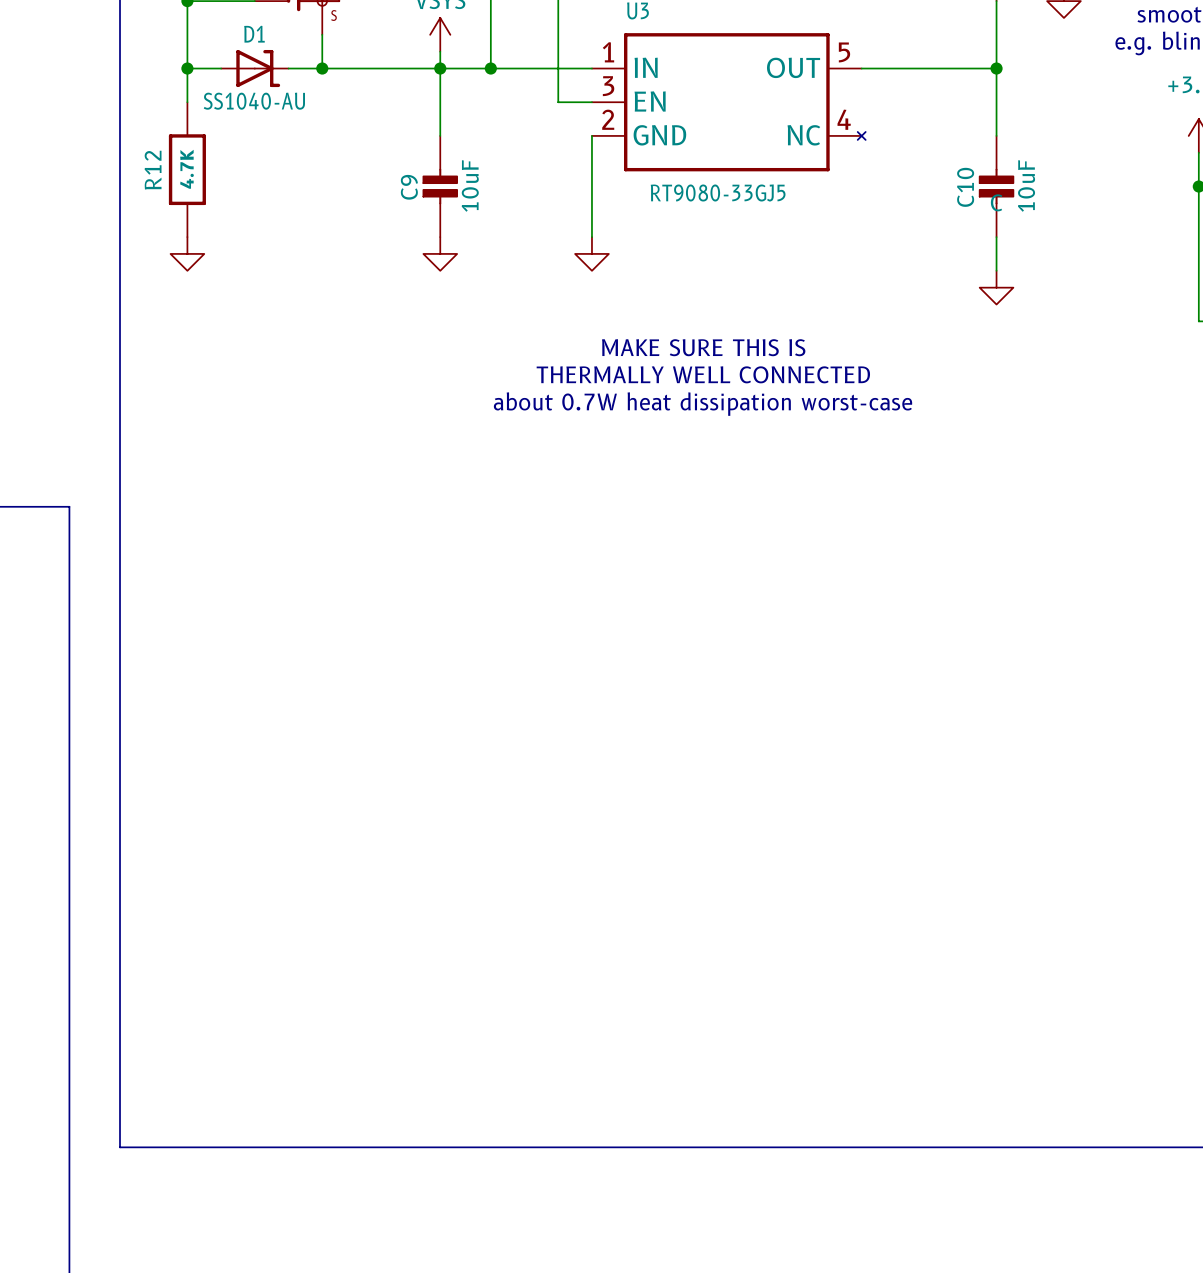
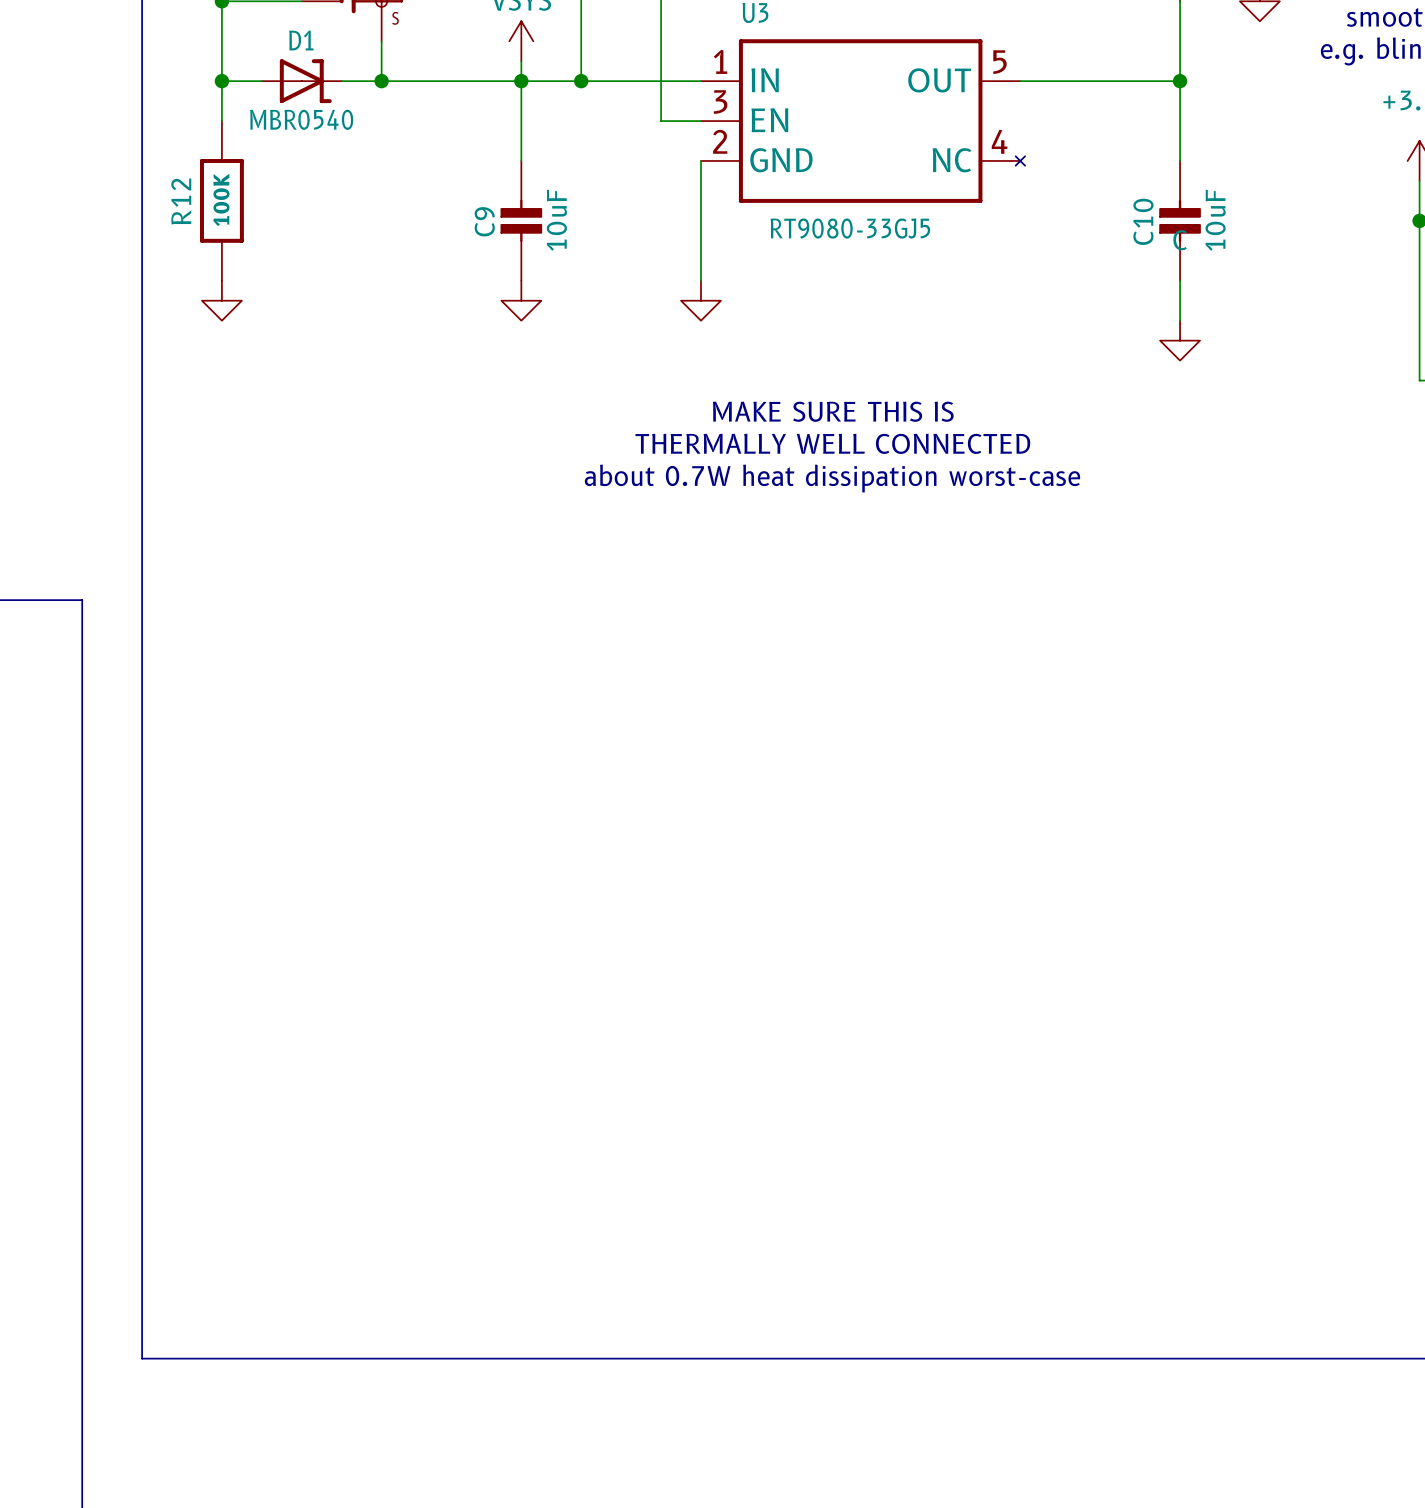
D1 value: SS1040-AU (254, 101) -> MBR0540 (301, 119)
R12 value: 4.7K (187, 169) -> 100K (221, 199)

